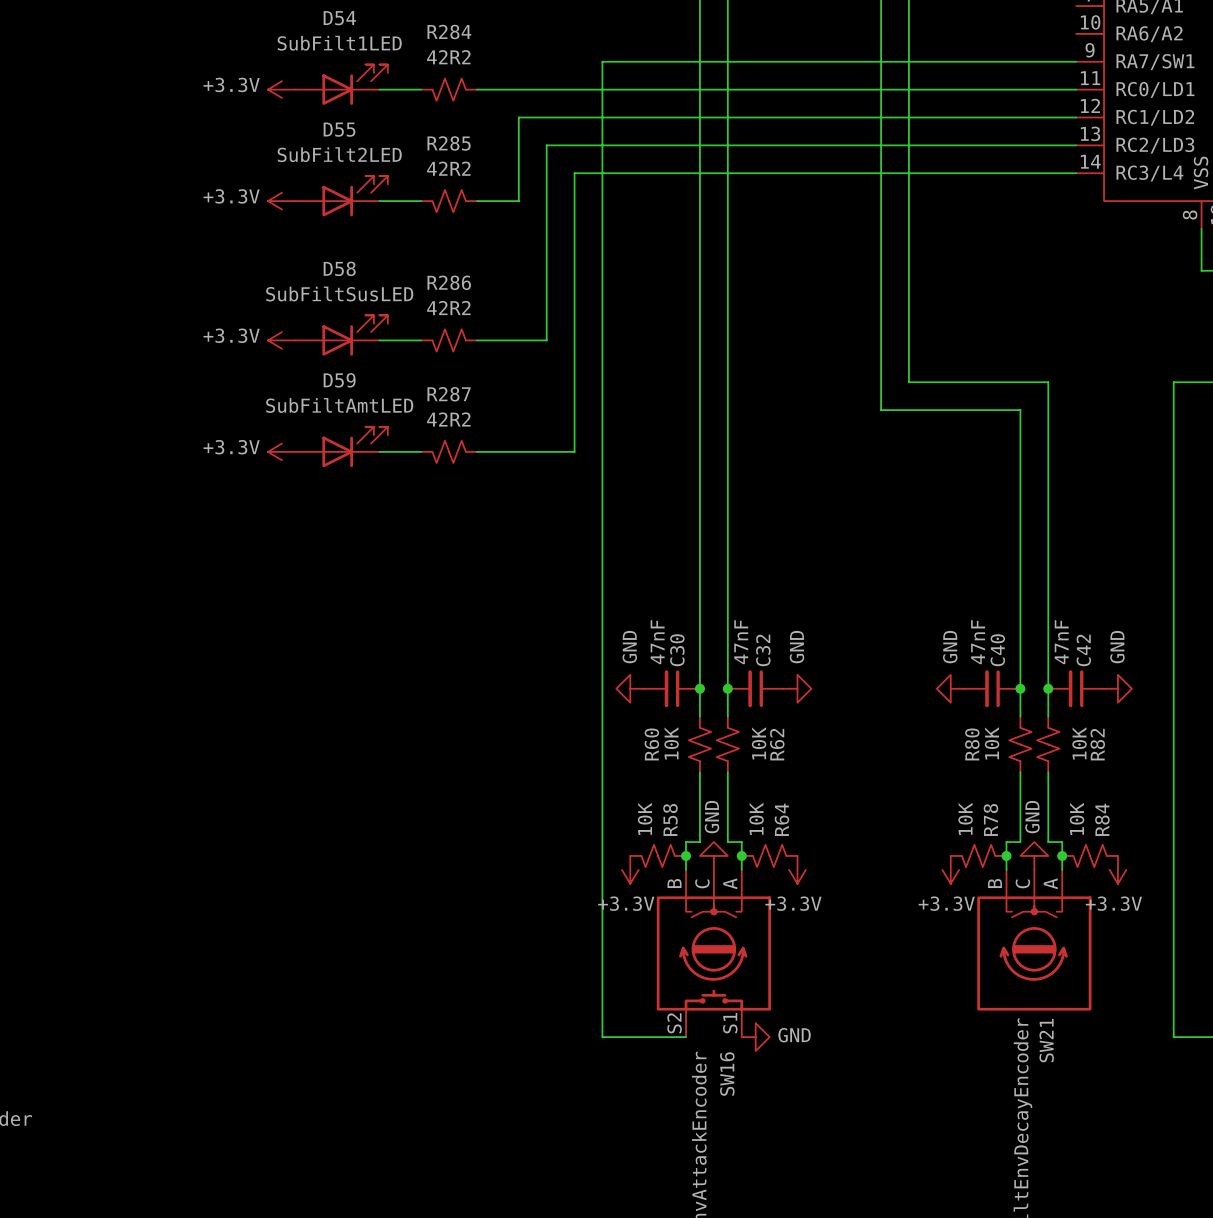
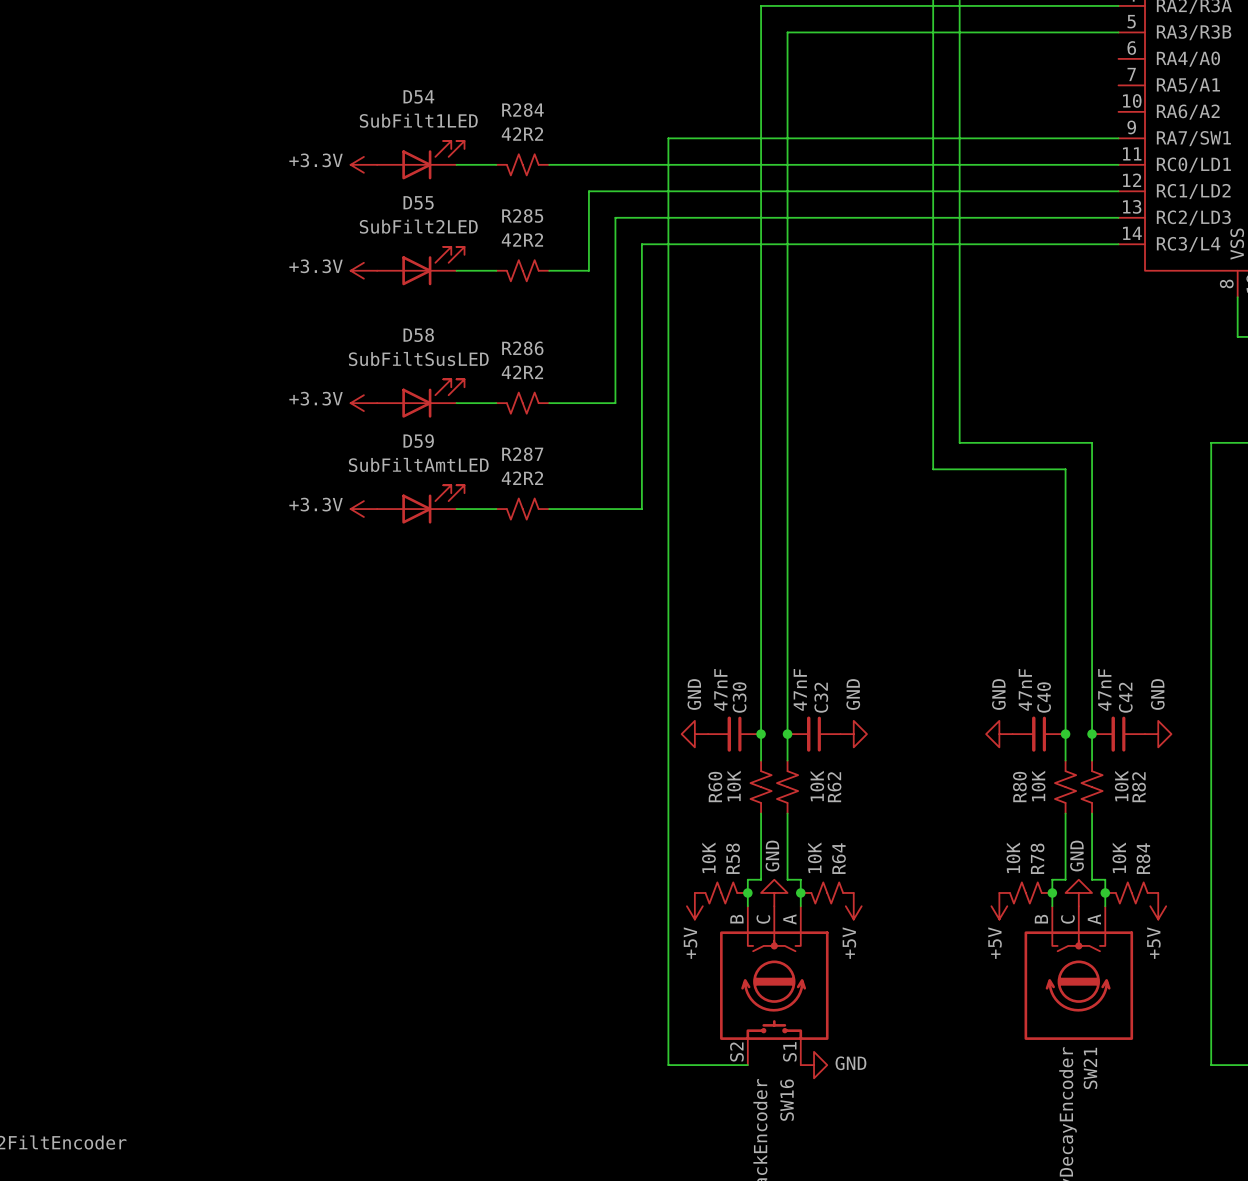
power symbol: +3.3V (630, 869) -> +5V (694, 906)
power symbol: +3.3V (797, 869) -> +5V (853, 906)
power symbol: +3.3V (950, 869) -> +5V (999, 906)
power symbol: +3.3V (1117, 869) -> +5V (1158, 906)

